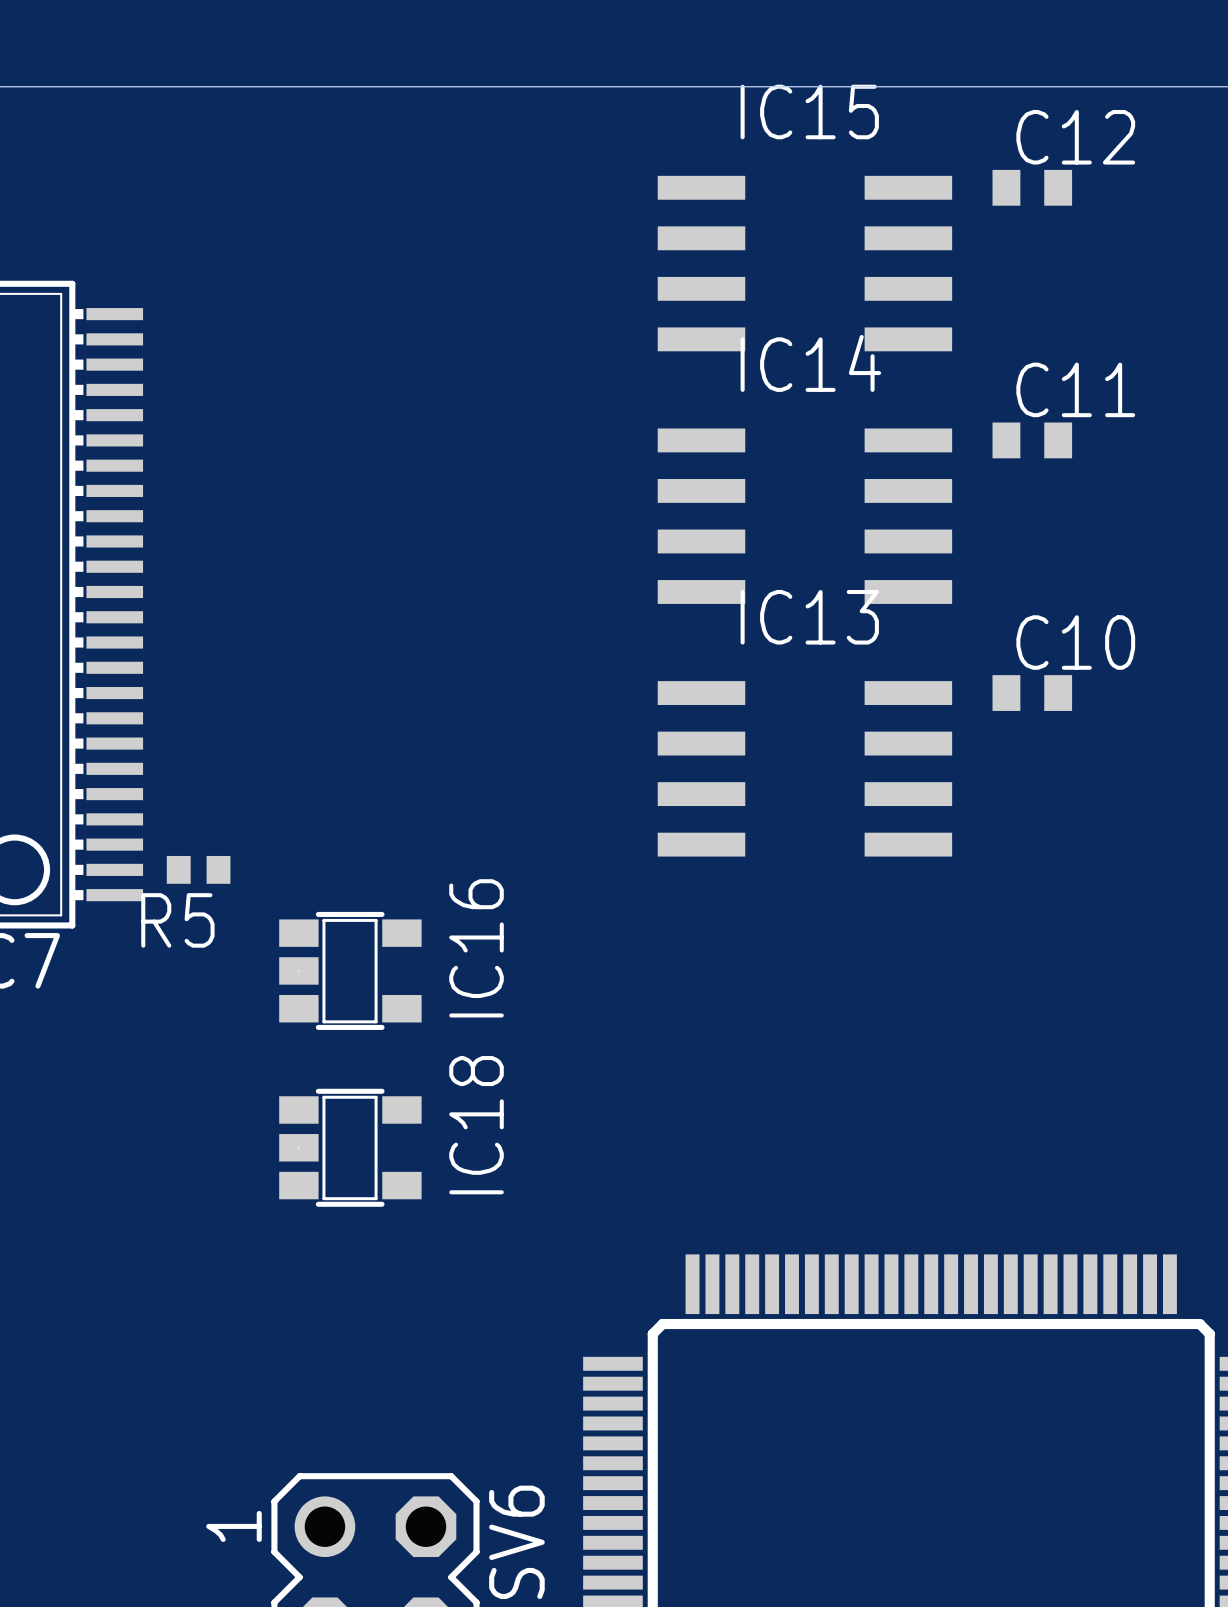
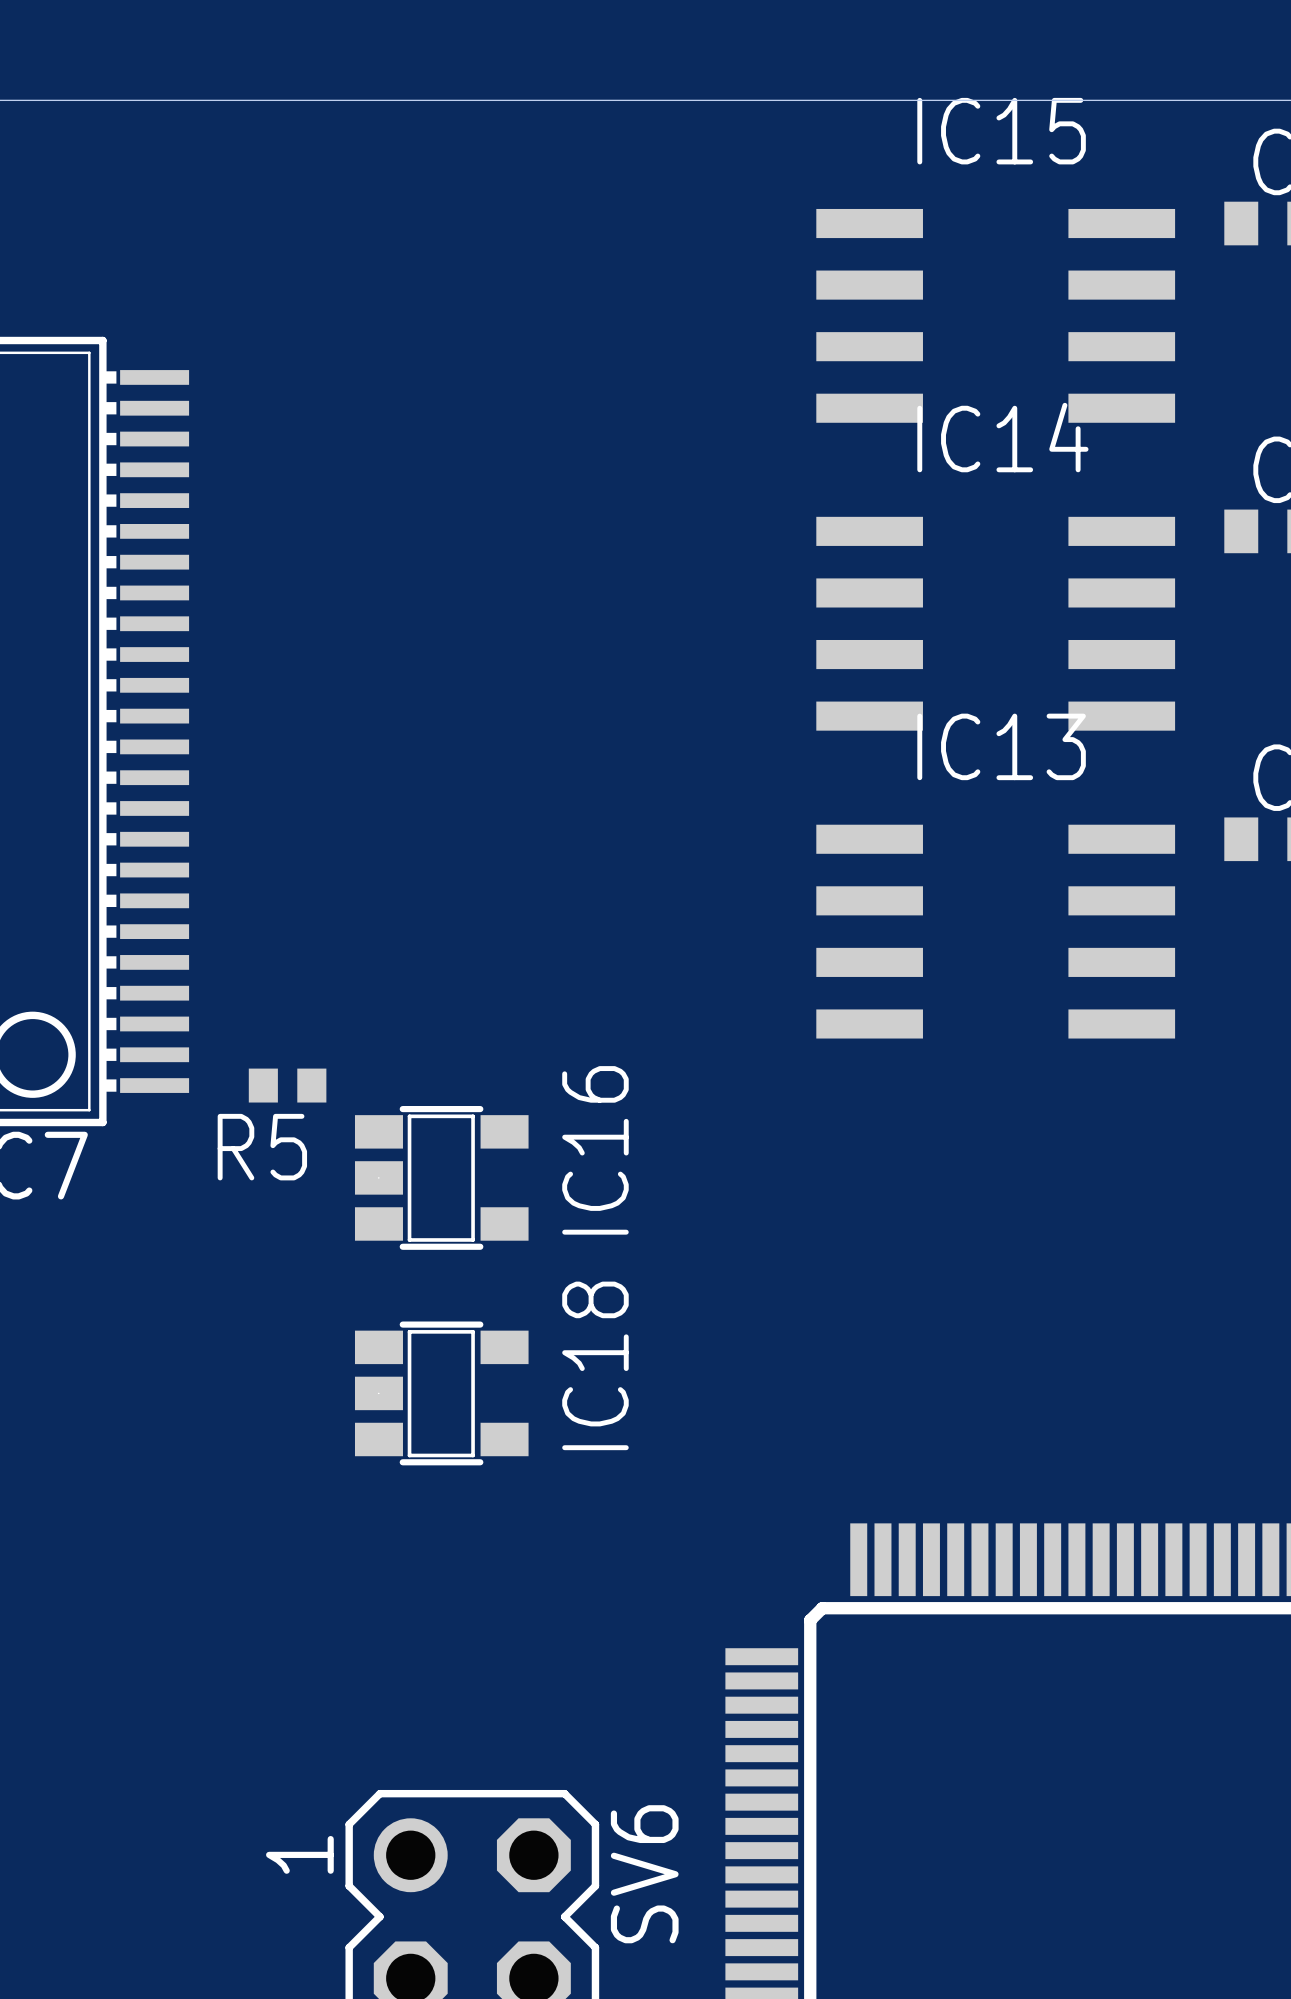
R5 position: (198, 869) -> (287, 1085)

